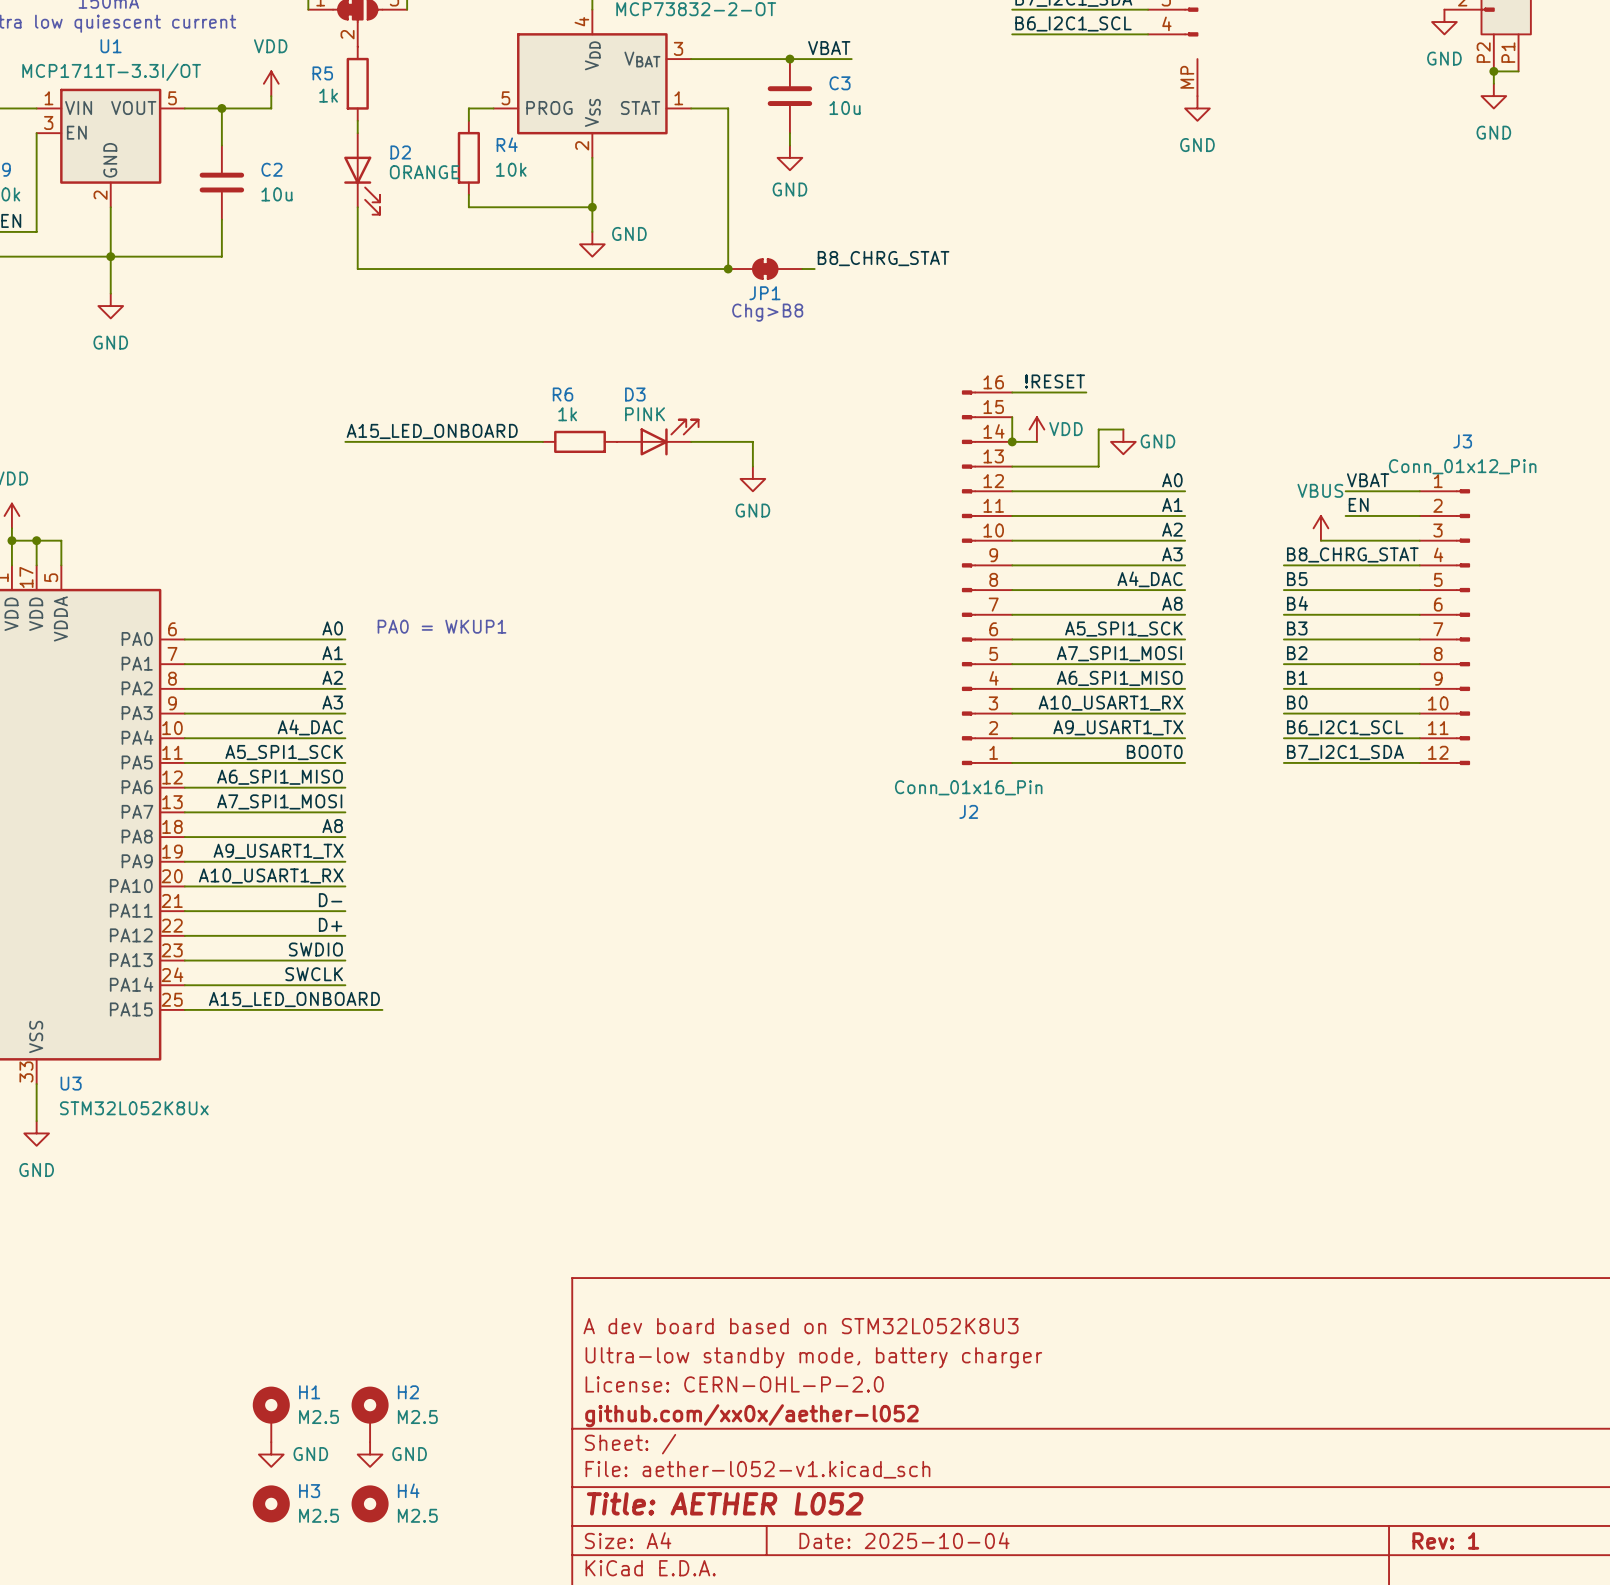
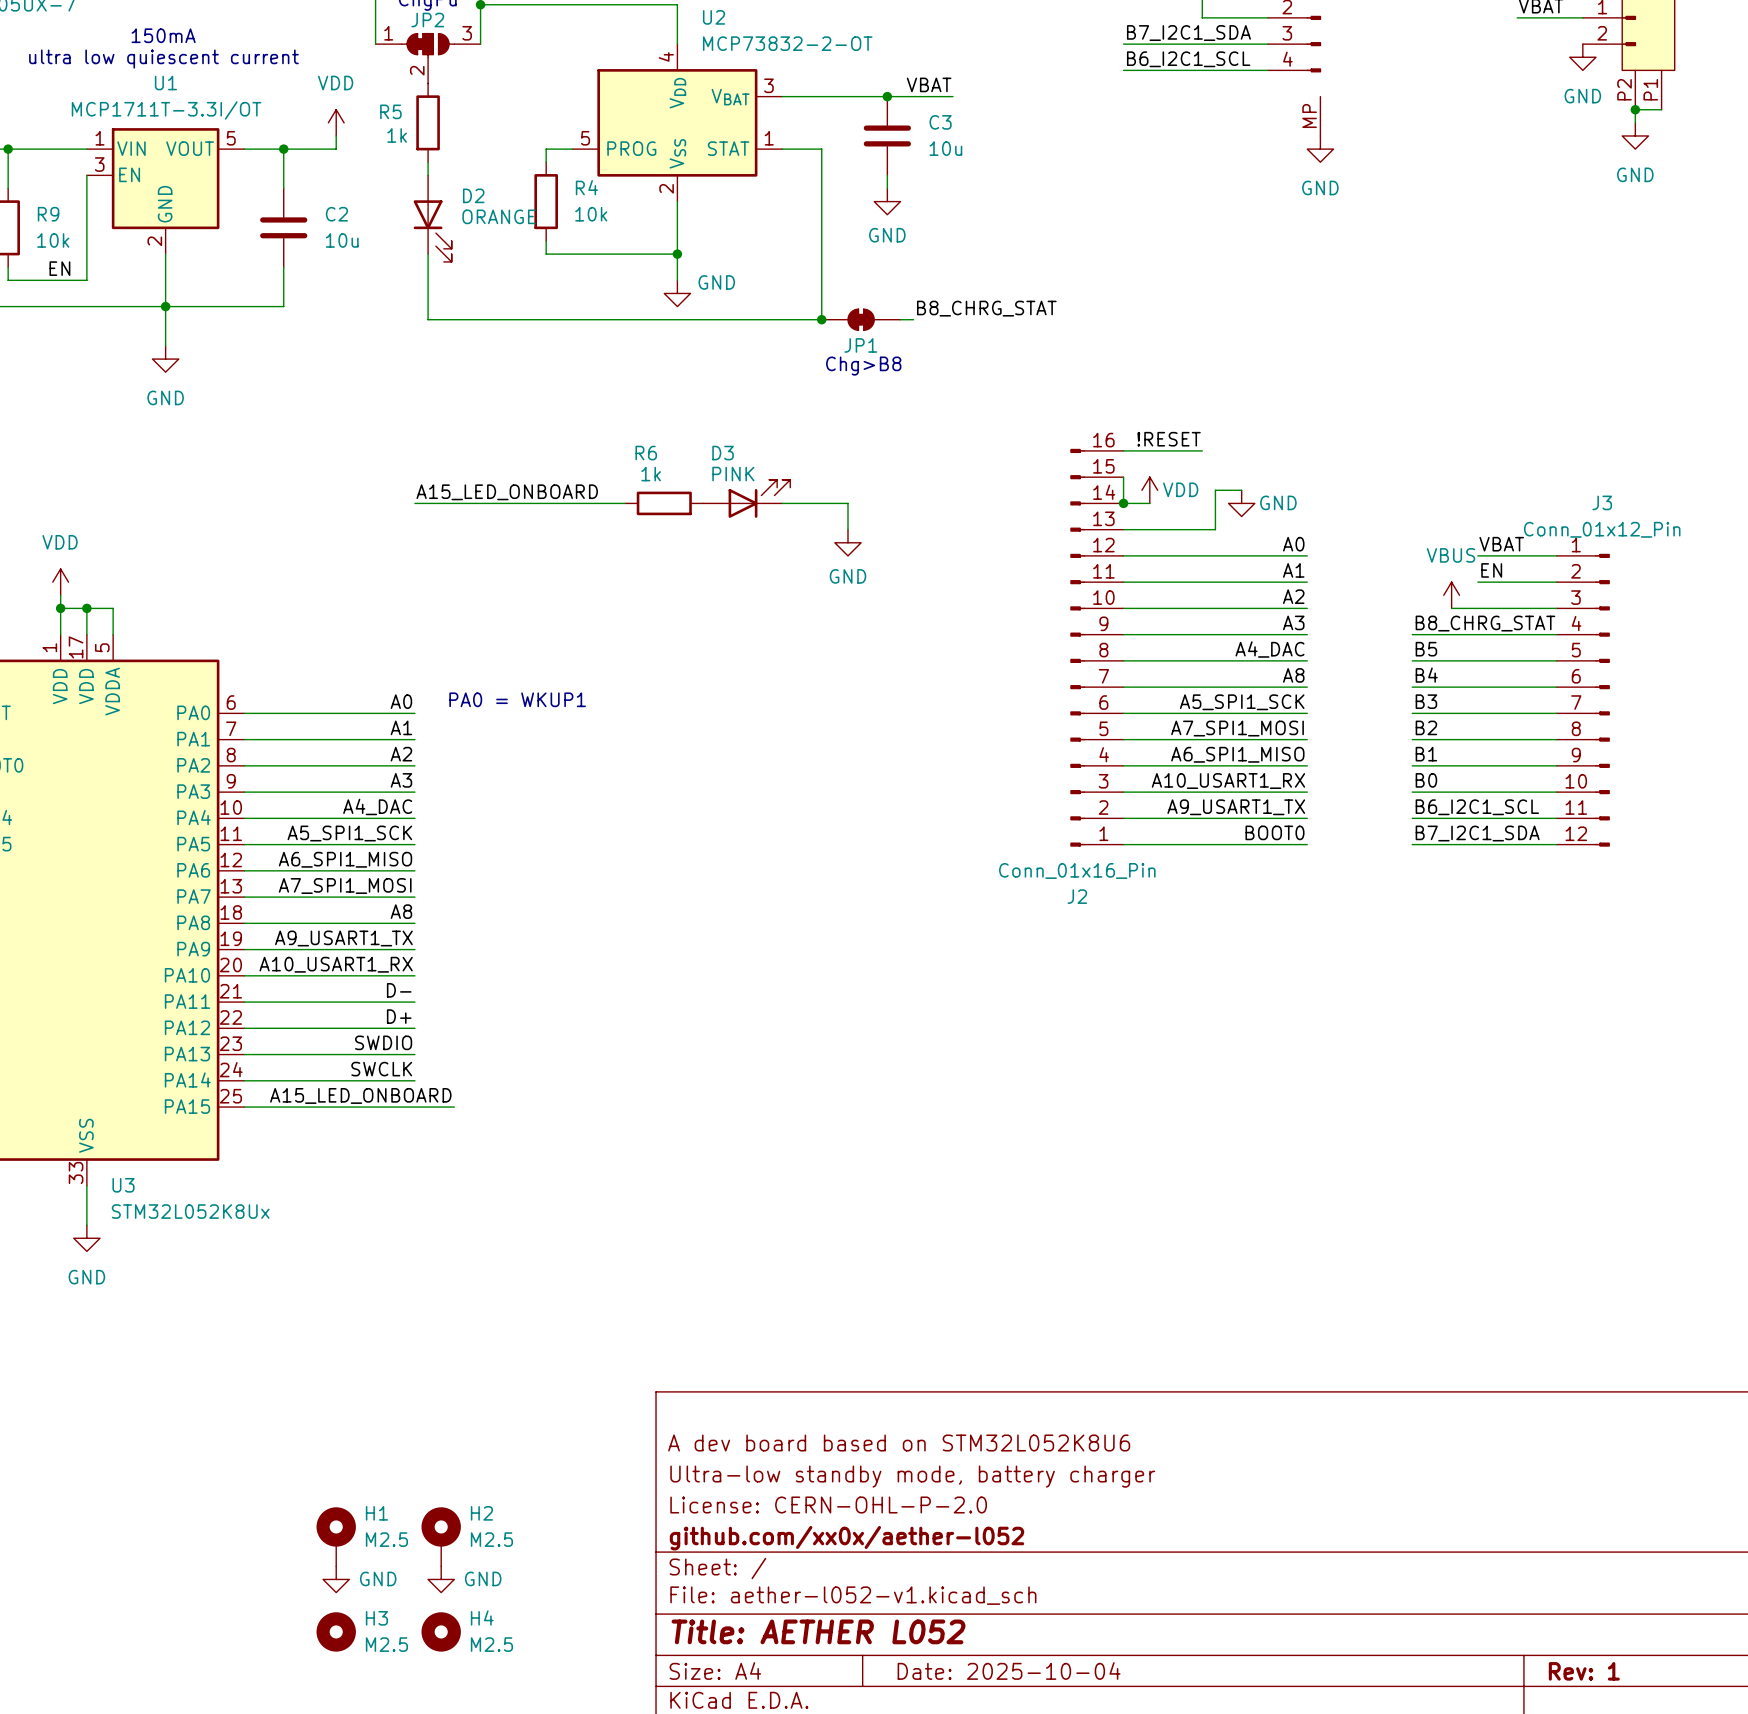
title block: A dev board based on STM32L052K8U3 (801, 1326) -> A dev board based on STM32L052K8U6 (899, 1443)

